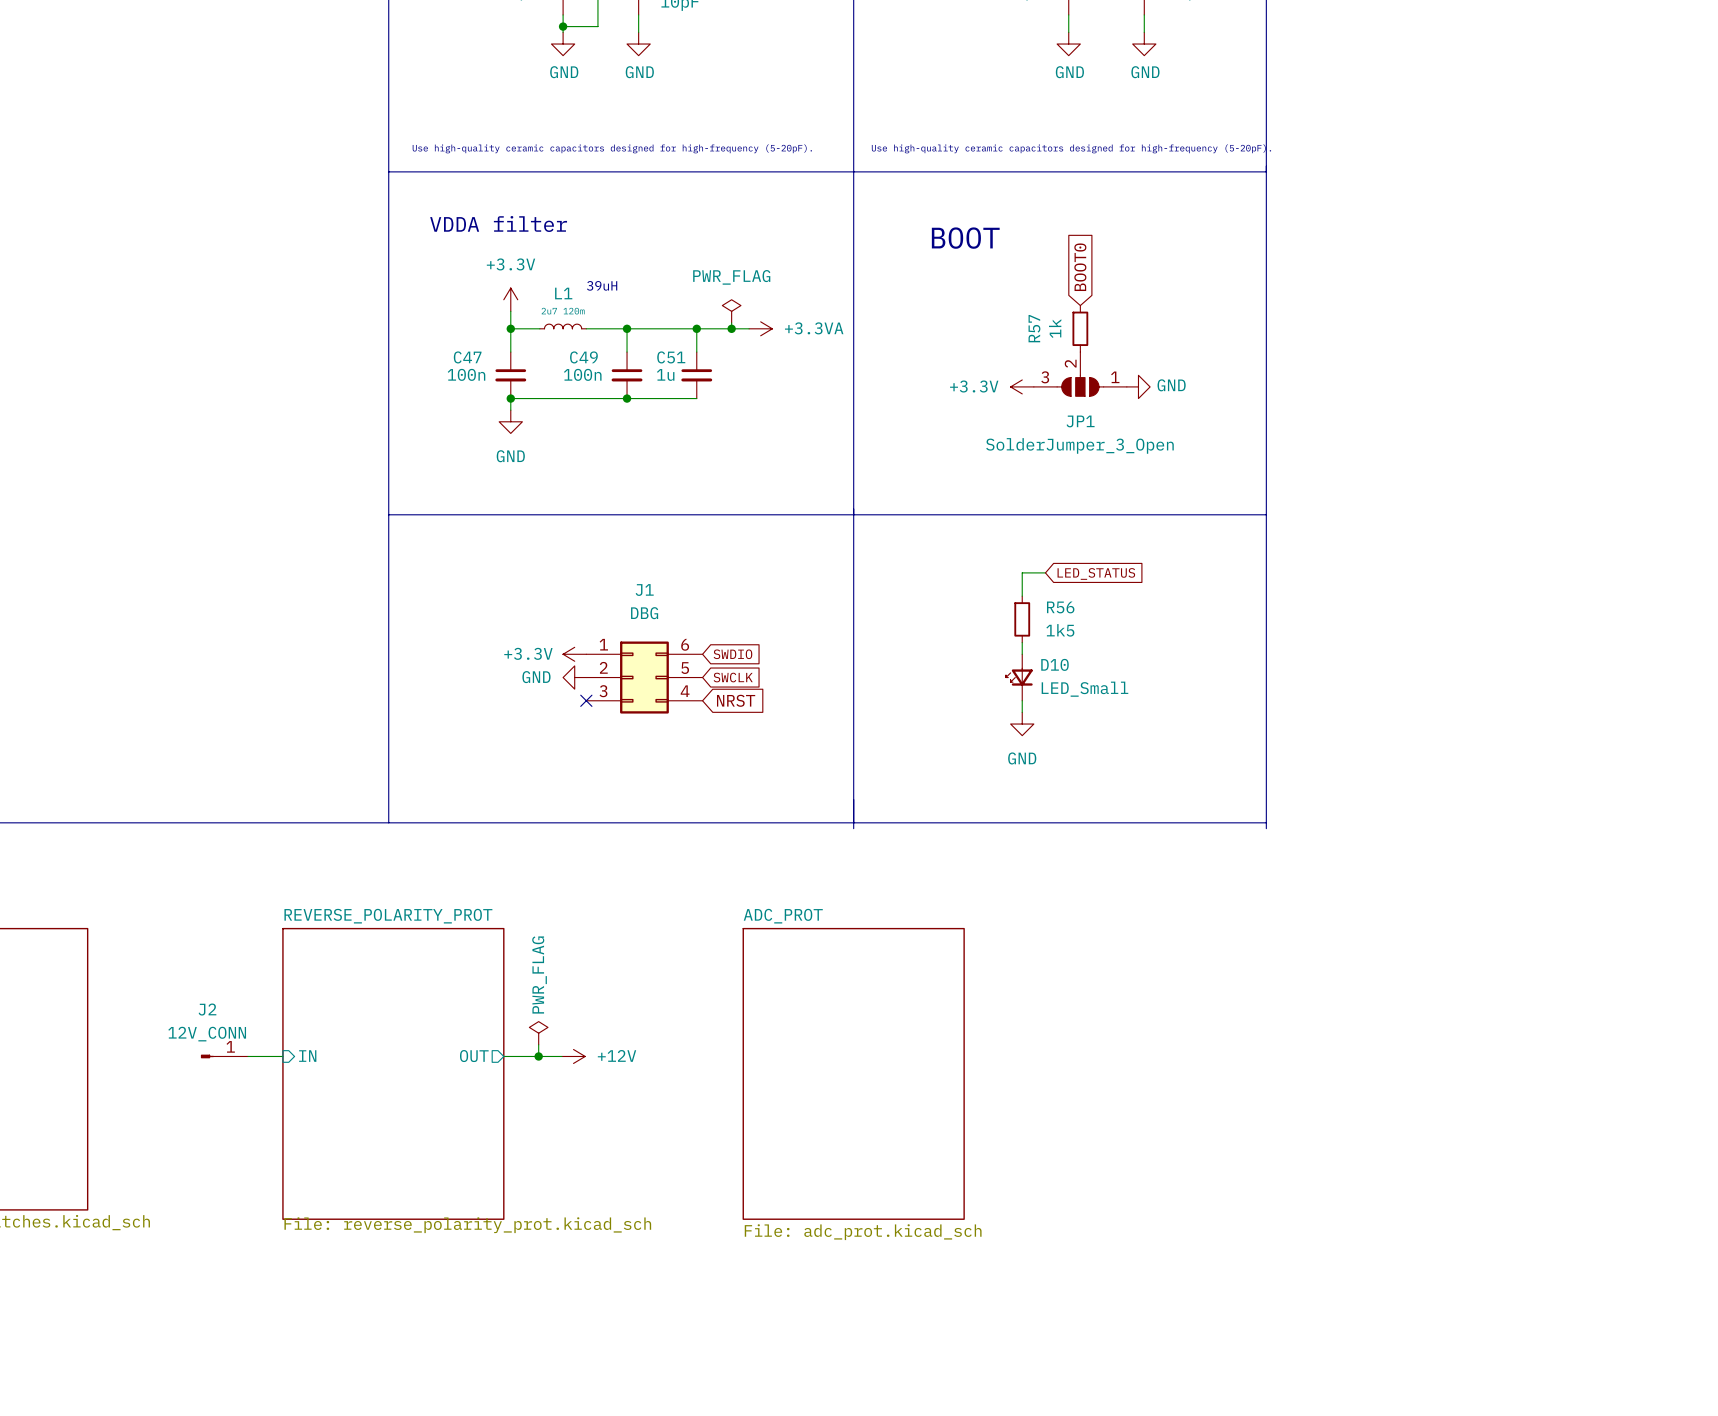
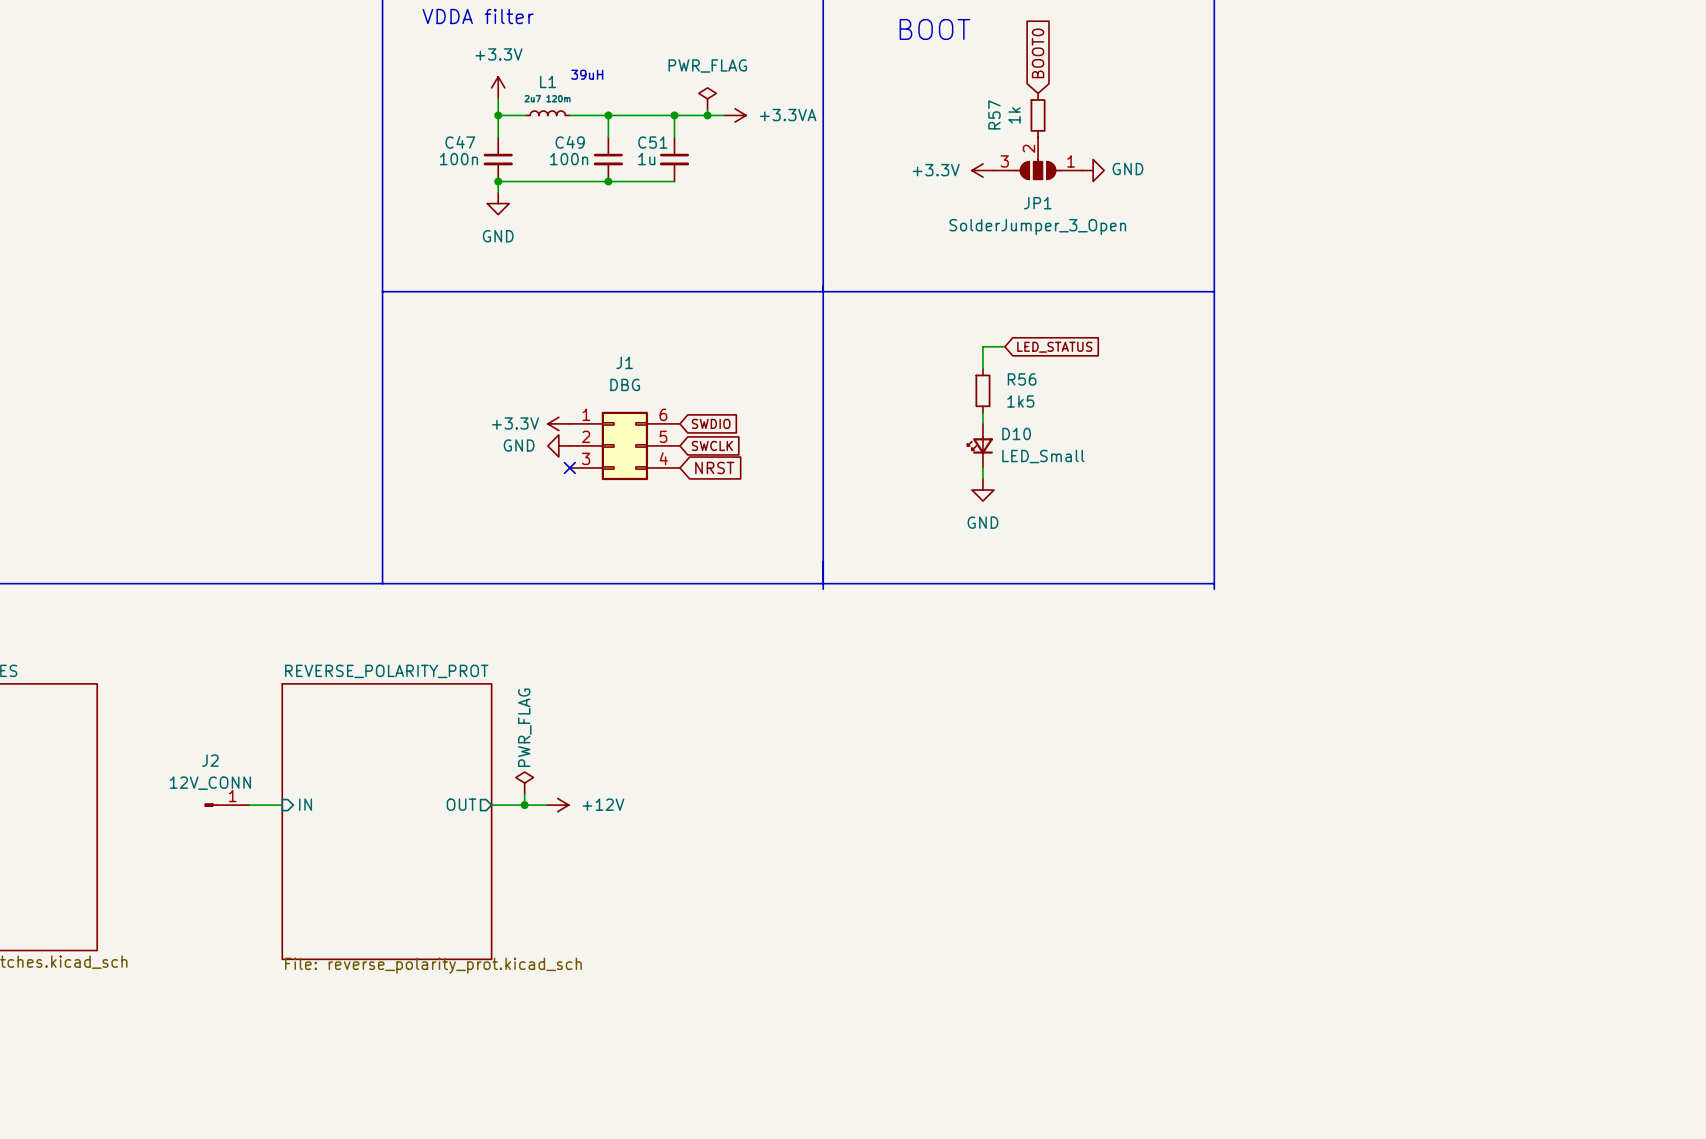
sheet ADC_PROT: File: adc_prot.kicad_sch (853, 1073) -> none

